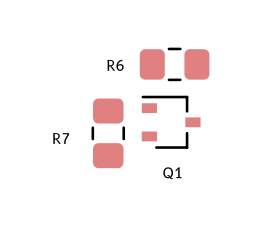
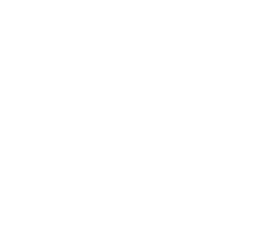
R6: (174, 64) -> none
Q1: (171, 122) -> none
R7: (108, 133) -> none

